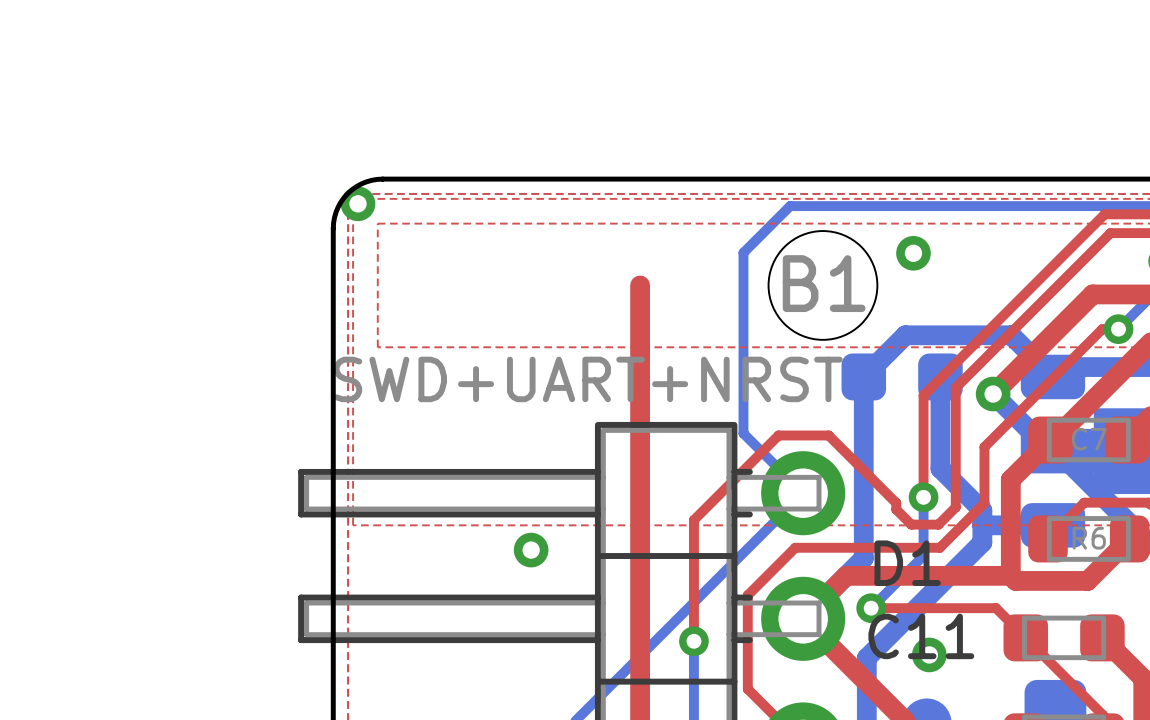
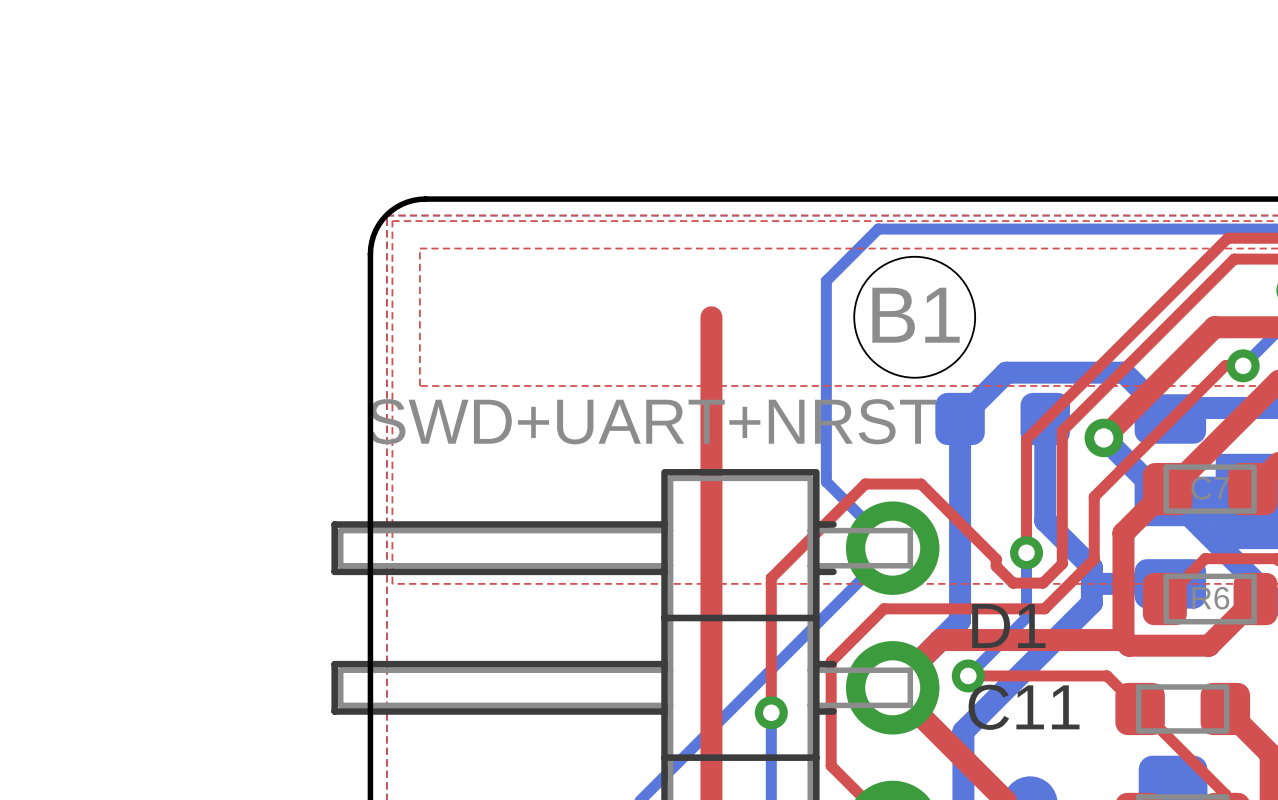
via: (358, 203) -> none
via: (913, 253) -> none
via: (531, 550) -> none
via: (929, 654) -> none

